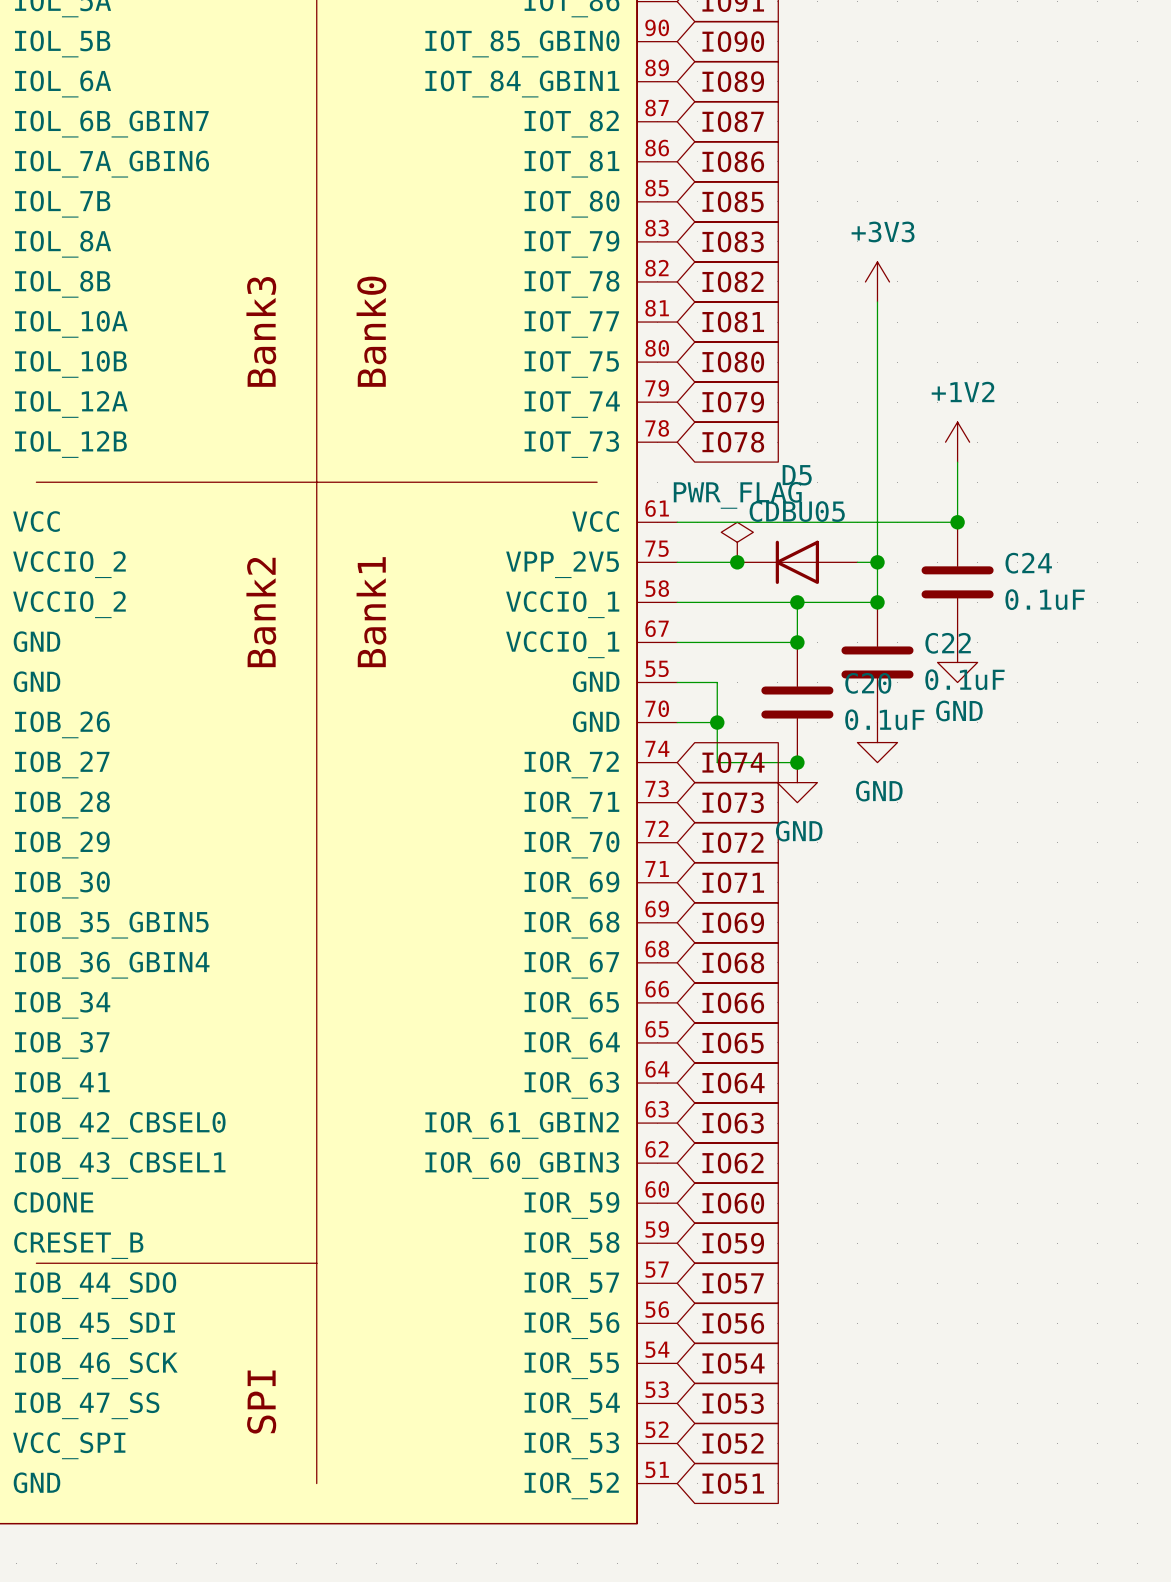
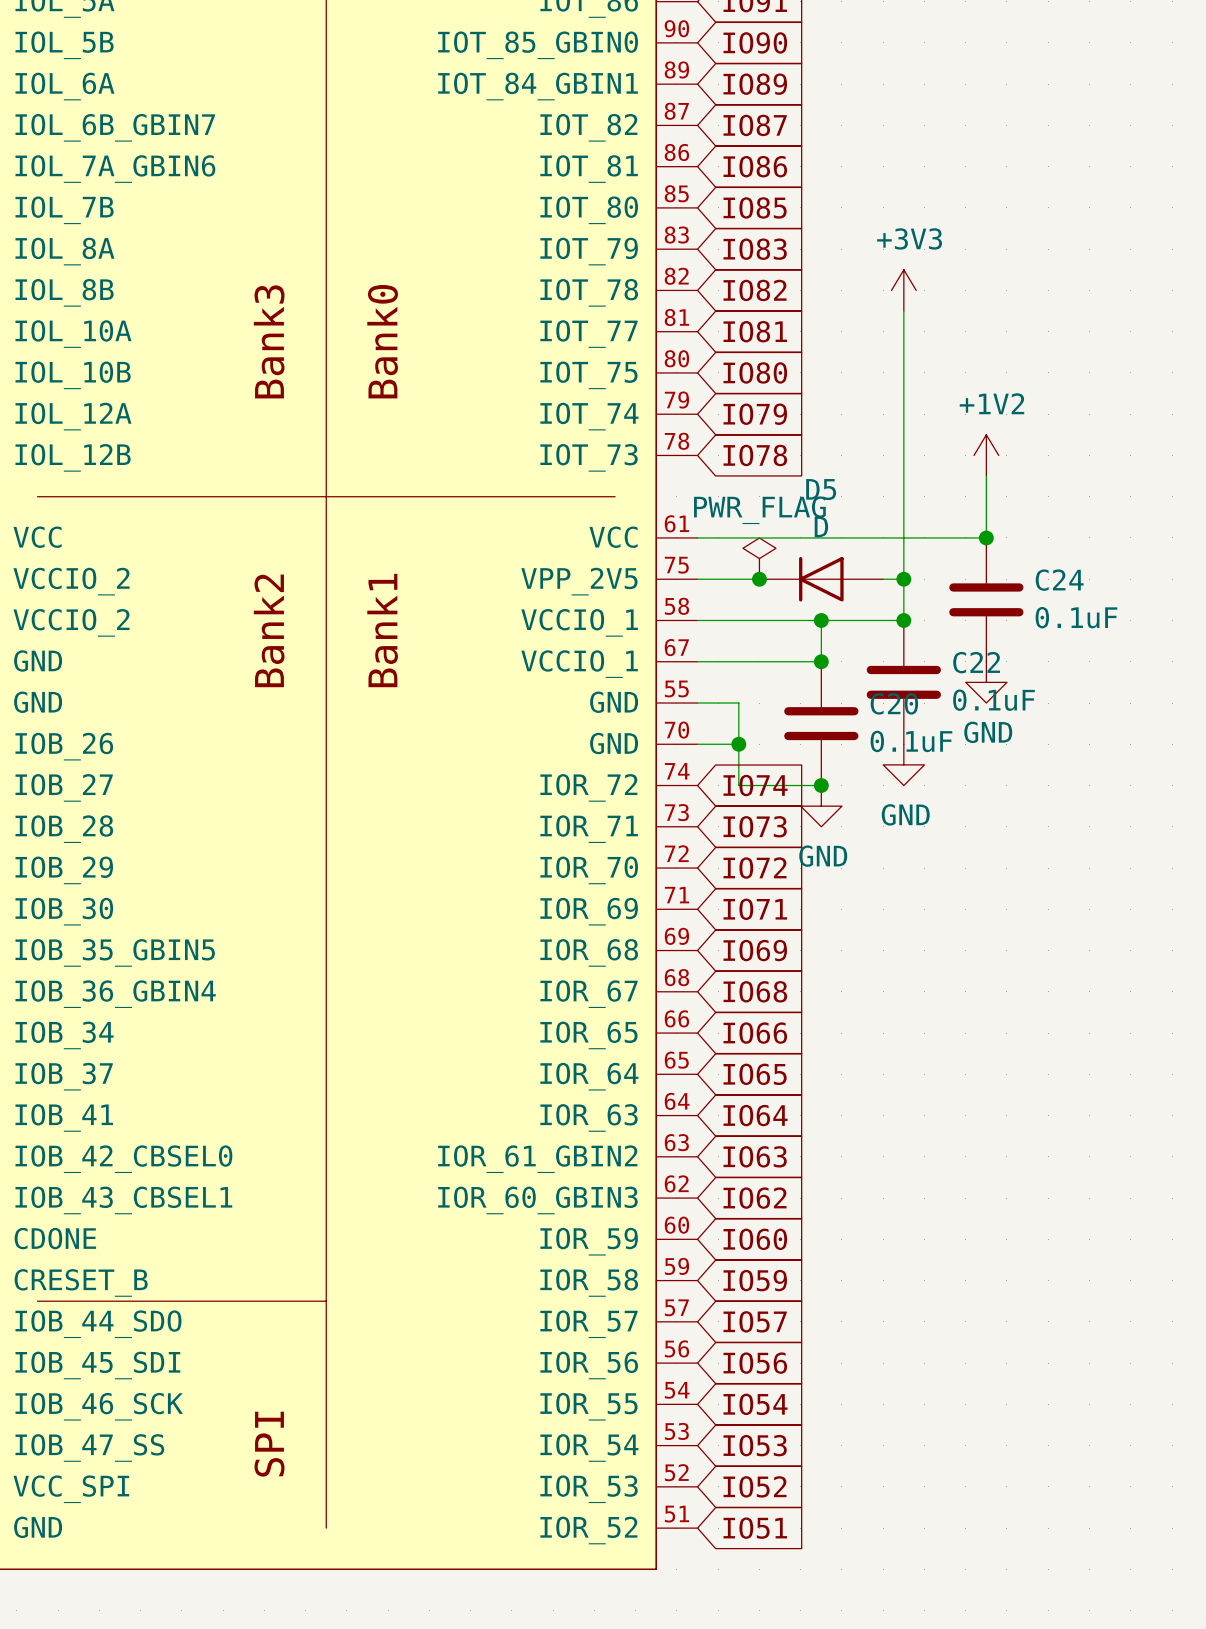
D5 value: CDBU05 (797, 511) -> D (821, 526)

